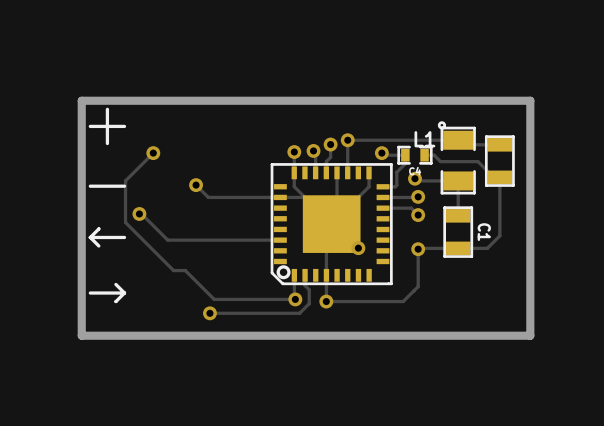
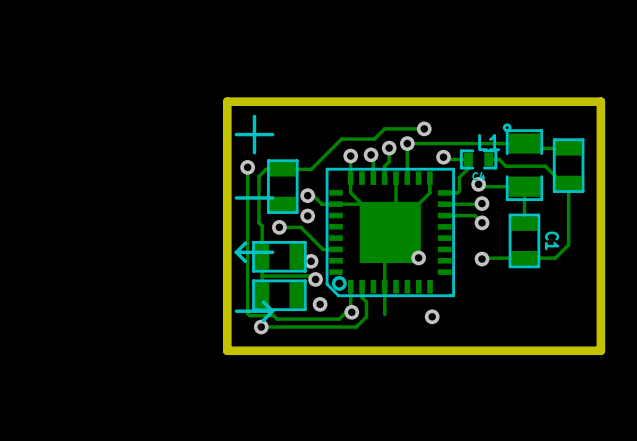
board edge: (177, 100) (81, 100) (81, 335) (177, 335) -> (227, 101) (227, 350)
line: (107, 109) (107, 143) -> (254, 116) (254, 152)
line: (124, 126) (90, 126) -> (272, 134) (236, 134)
track: none -> (424, 128) (384, 128) (374, 139) (341, 139) (311, 169) (266, 169) (258, 176) (258, 222) (262, 225) (262, 295)
via: none -> (424, 128)
track: (153, 153) (125, 180) (125, 222) (173, 270) (185, 270) (214, 299) (290, 299) -> (247, 167) (247, 313) (249, 315) (273, 315) (277, 319) (339, 319) (346, 312)
via: (153, 153) -> none
via: none -> (247, 167)
part: none -> (282, 186)
track: (196, 185) (208, 197) (267, 197) -> (307, 195) (313, 195) (321, 204)
via: (196, 185) -> none
line: (124, 186) (90, 186) -> (272, 197) (236, 197)
via: none -> (307, 195)
via: none -> (307, 216)
track: (139, 213) (167, 240) (268, 240) -> (279, 227) (300, 227) (322, 249)
via: (139, 213) -> none
via: none -> (279, 227)
line: (98, 228) (90, 237) -> (245, 243) (236, 252)
line: (90, 237) (98, 245) -> (236, 252) (245, 261)
line: (124, 237) (90, 237) -> (272, 252) (236, 252)
part: none -> (279, 256)
track: (418, 249) (418, 286) (403, 301) (326, 301) -> none
via: none -> (311, 261)
track: none -> (262, 276) (312, 276) (315, 279)
via: none -> (315, 279)
part: none -> (279, 295)
line: (115, 284) (124, 293) -> (263, 302) (272, 311)
via: none -> (320, 304)
line: (124, 293) (115, 301) -> (272, 311) (263, 320)
line: (124, 293) (90, 293) -> (272, 311) (236, 311)
via: (326, 301) -> none
via: none -> (432, 316)

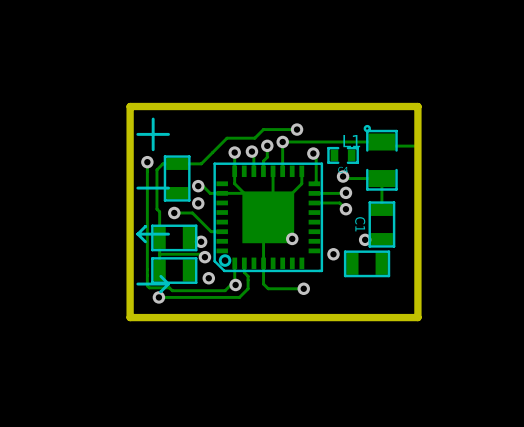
board edge: (566, 101) (600, 101) (600, 350) (566, 350) -> (417, 106) (417, 317)
track: (443, 157) (445, 159) (468, 159) (468, 168) (459, 177) (459, 191) (457, 192) (444, 192) -> (316, 154) (316, 181) (314, 183)
track: (488, 159) (498, 159) (505, 166) (545, 166) (562, 182) (568, 182) (568, 244) (555, 258) (482, 259) -> none
part rotation: 0° (568, 165) -> 90° clockwise (367, 263)
part position: (568, 165) -> (367, 263)
C1 name position: C1 (552, 240) -> C1 (360, 224)
via: (482, 259) -> none
via: none -> (365, 239)
via: none -> (333, 254)
track: (384, 311) (384, 314) -> (263, 284) (268, 288) (303, 288)

